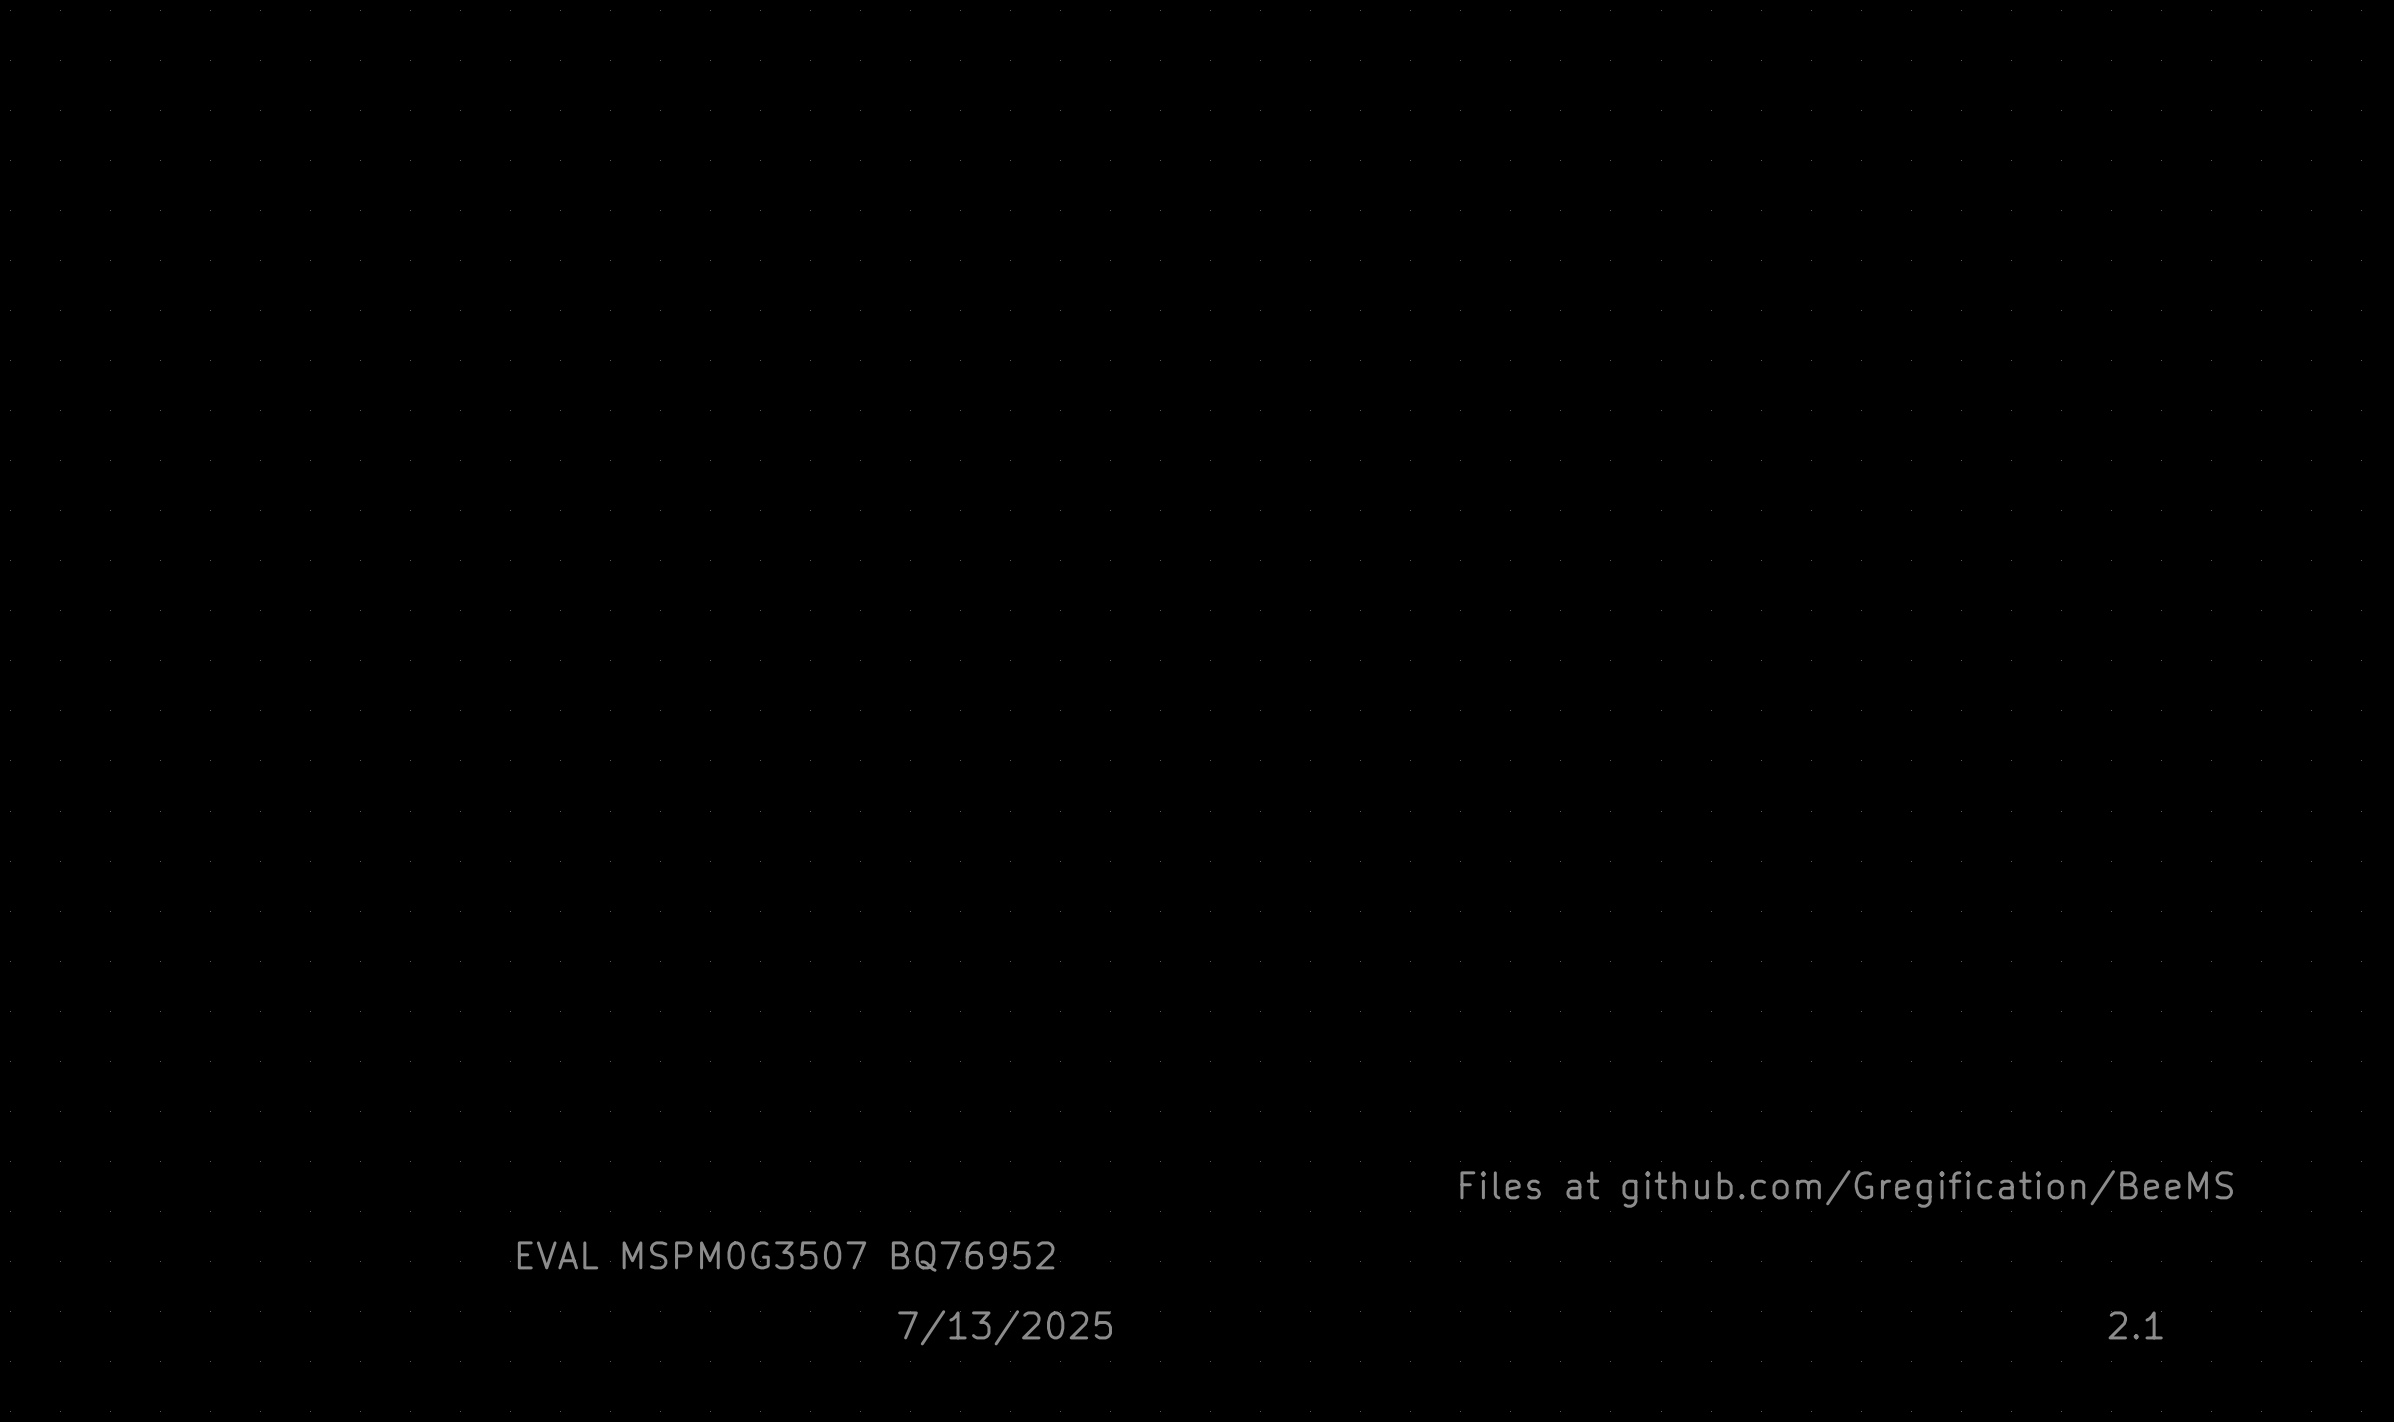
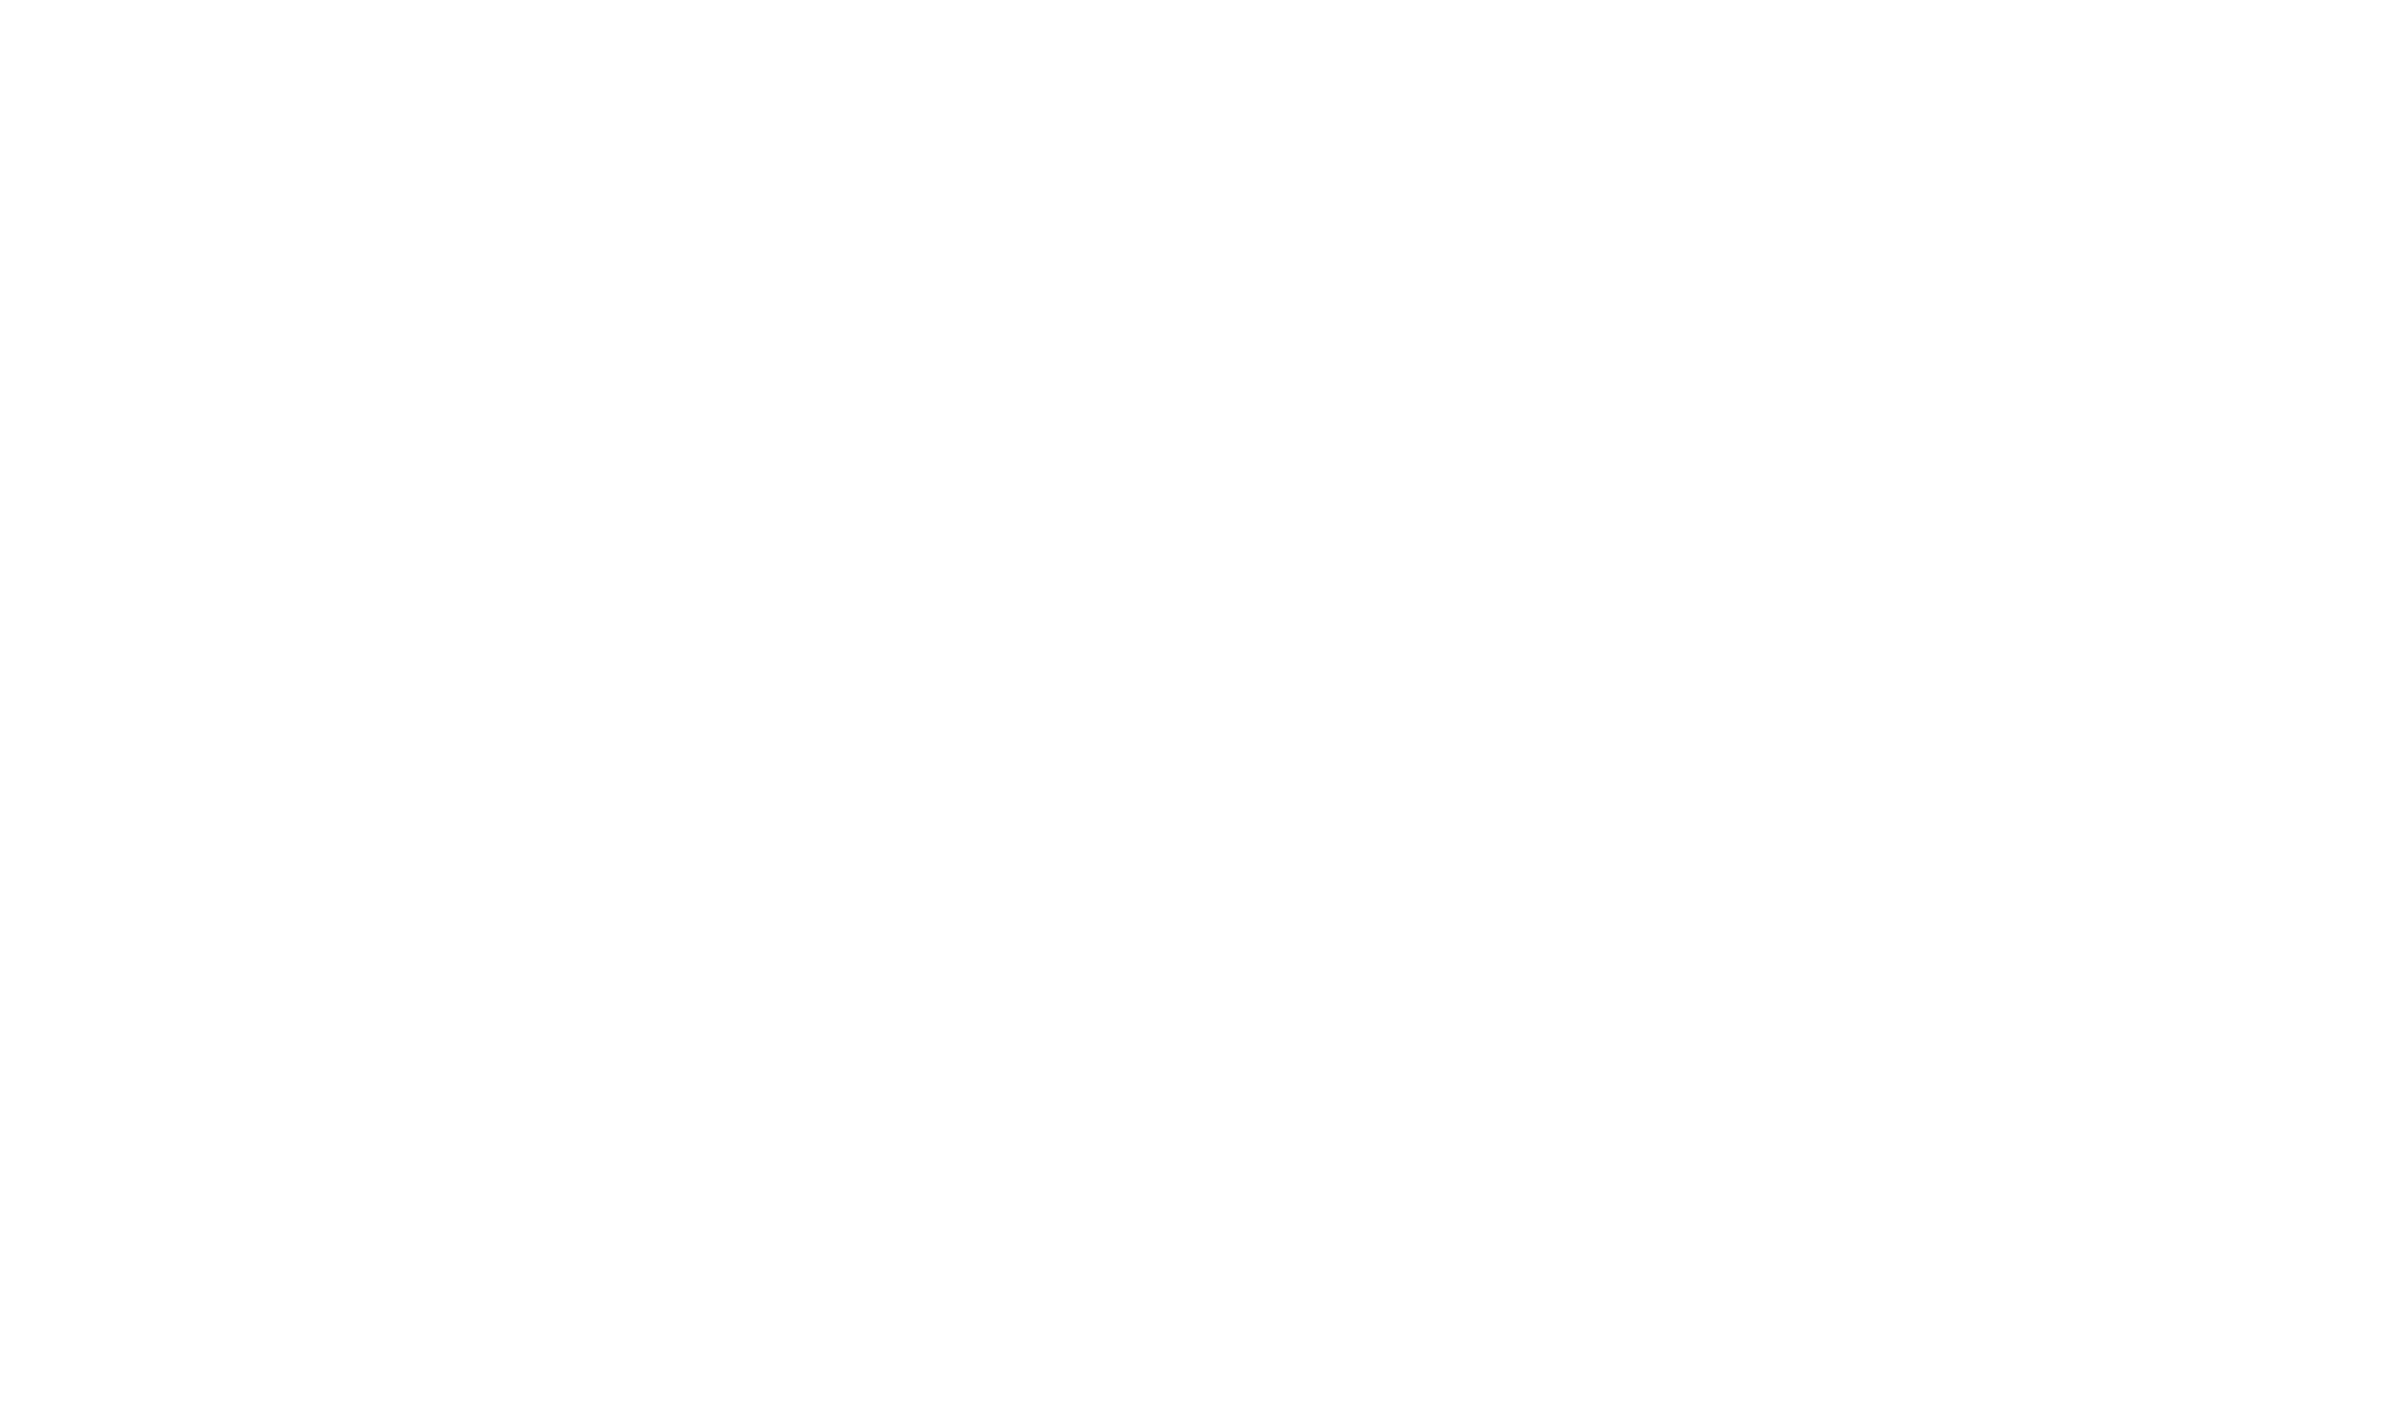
text: Files at github.com/Gregification/BeeMS (1846, 1188) -> none
text: EVAL MSPM0G3507 BQ76952 (786, 1256) -> none
text: 2.1 (2135, 1325) -> none
text: 7/13/2025 (1005, 1327) -> none

